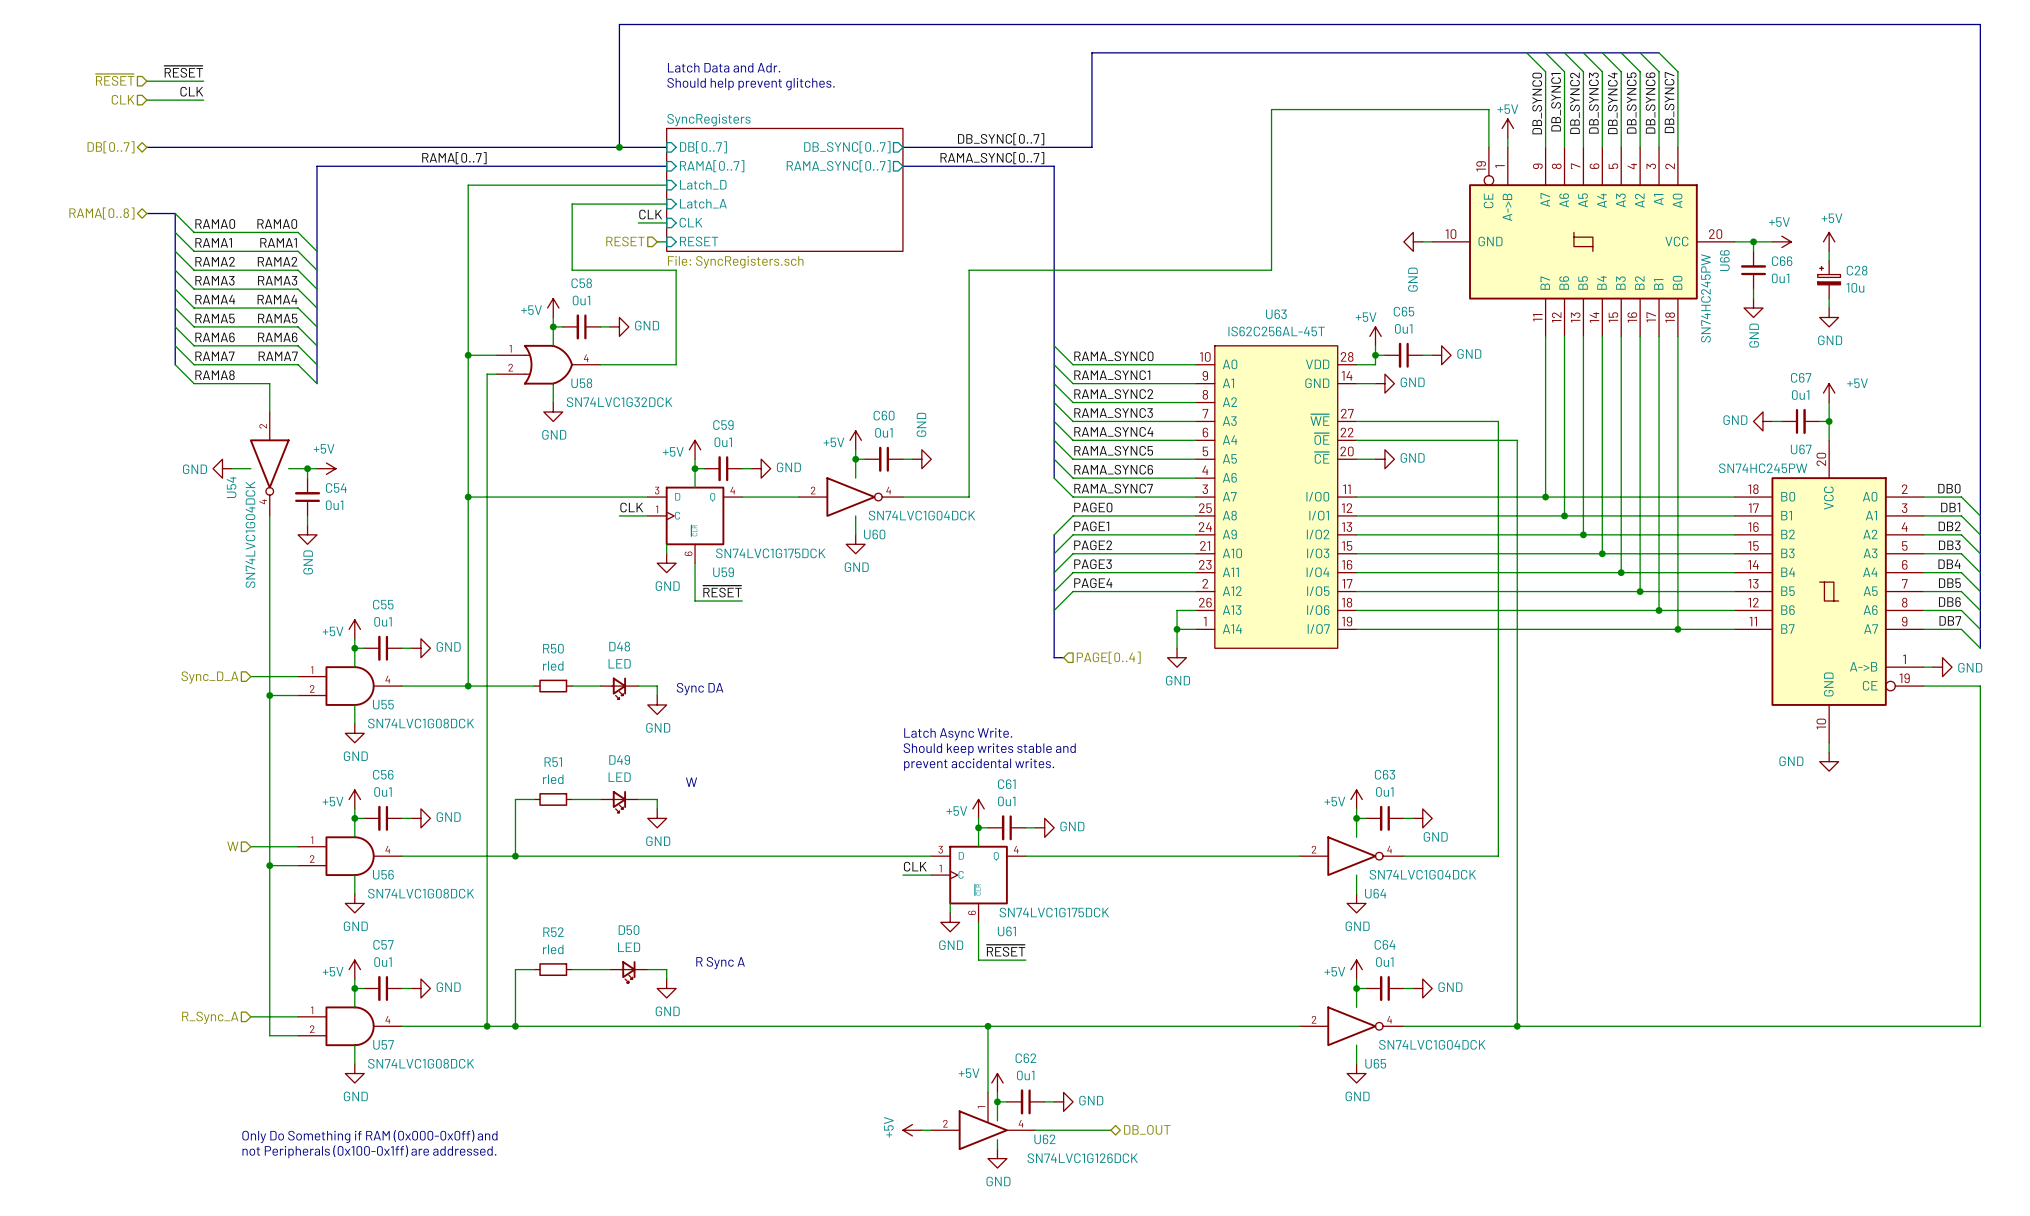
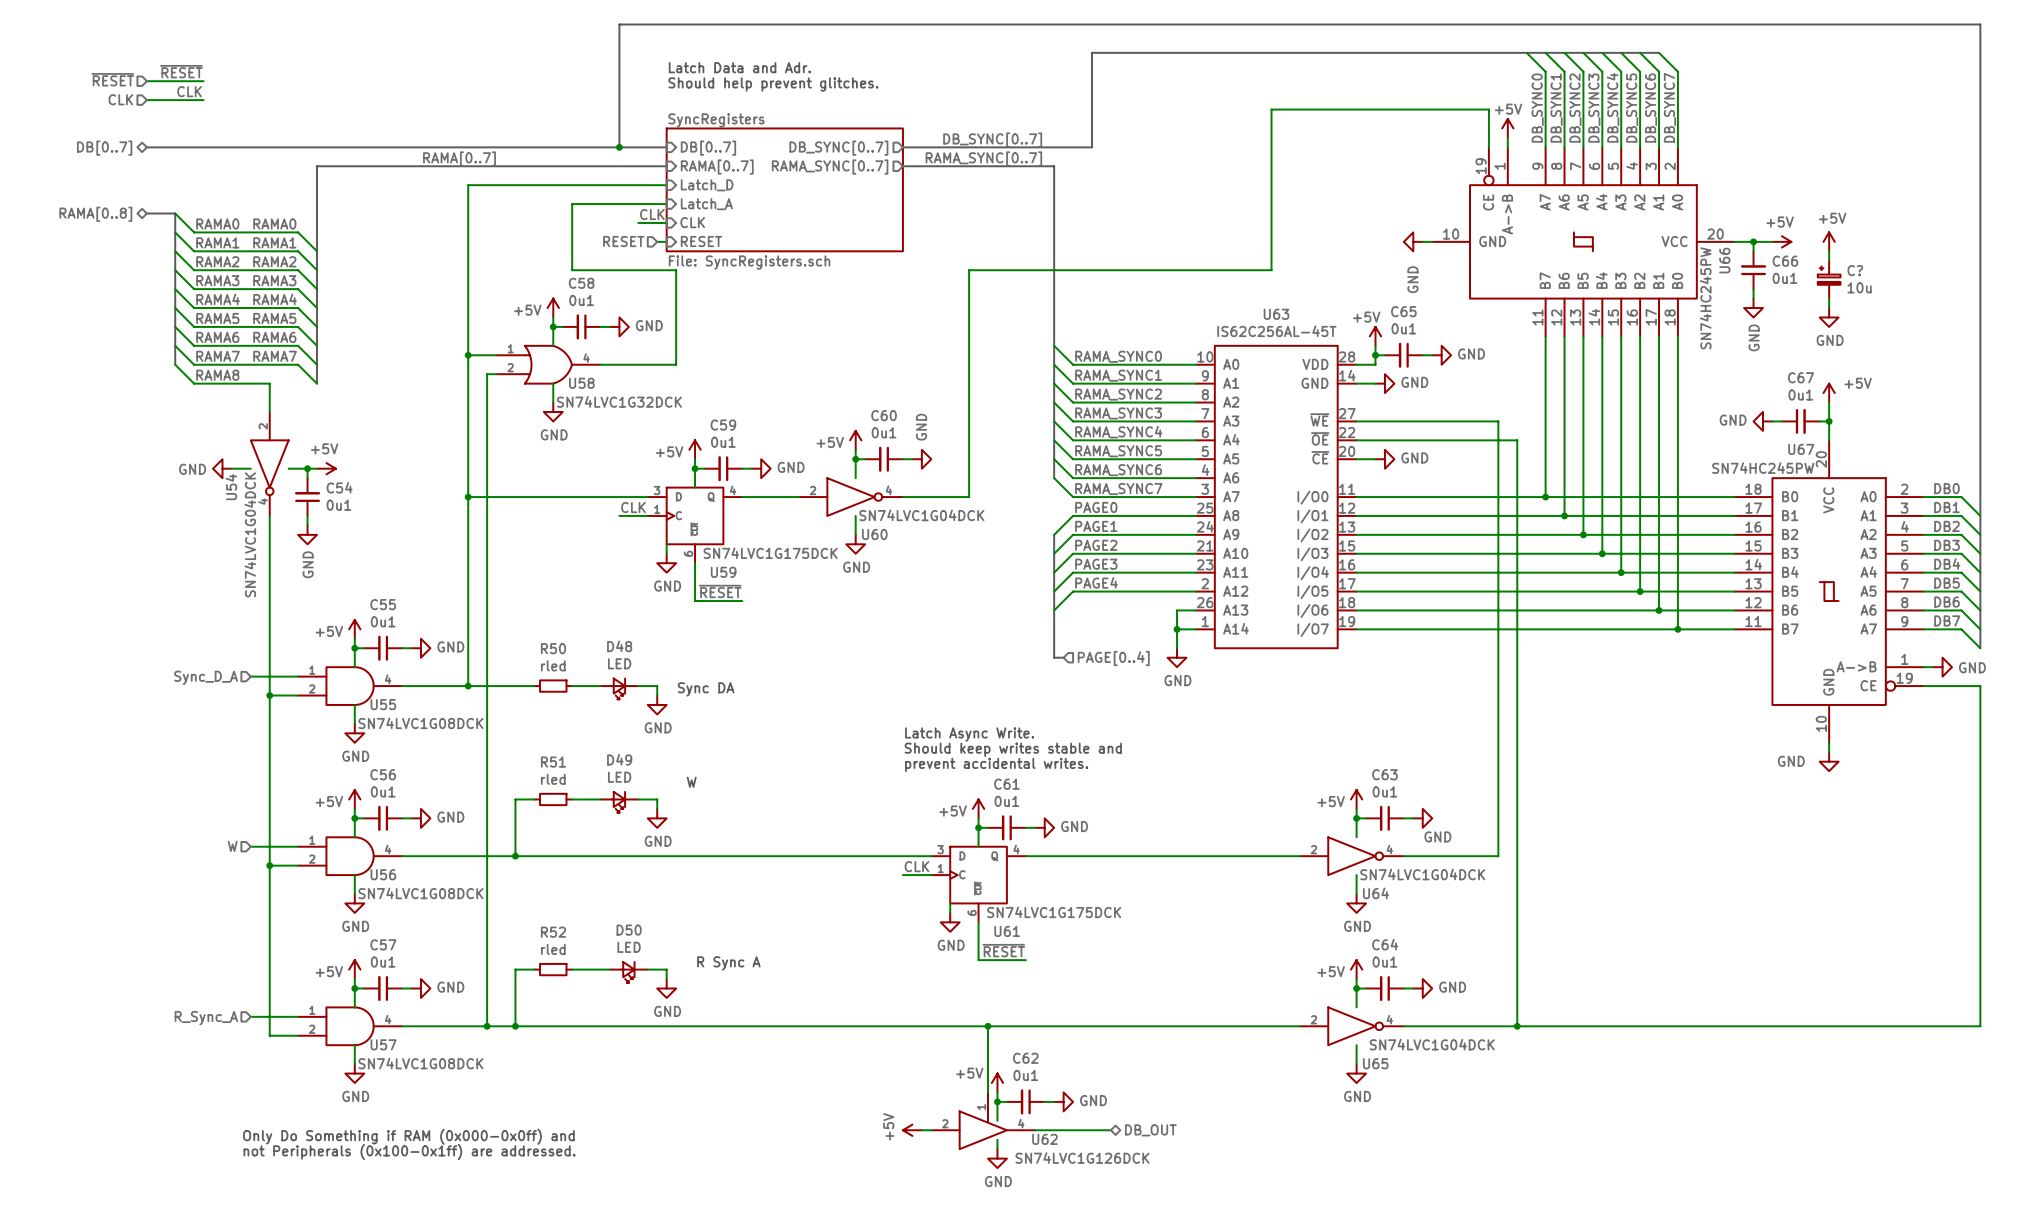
C28 name: C28 (1857, 270) -> C? (1855, 270)

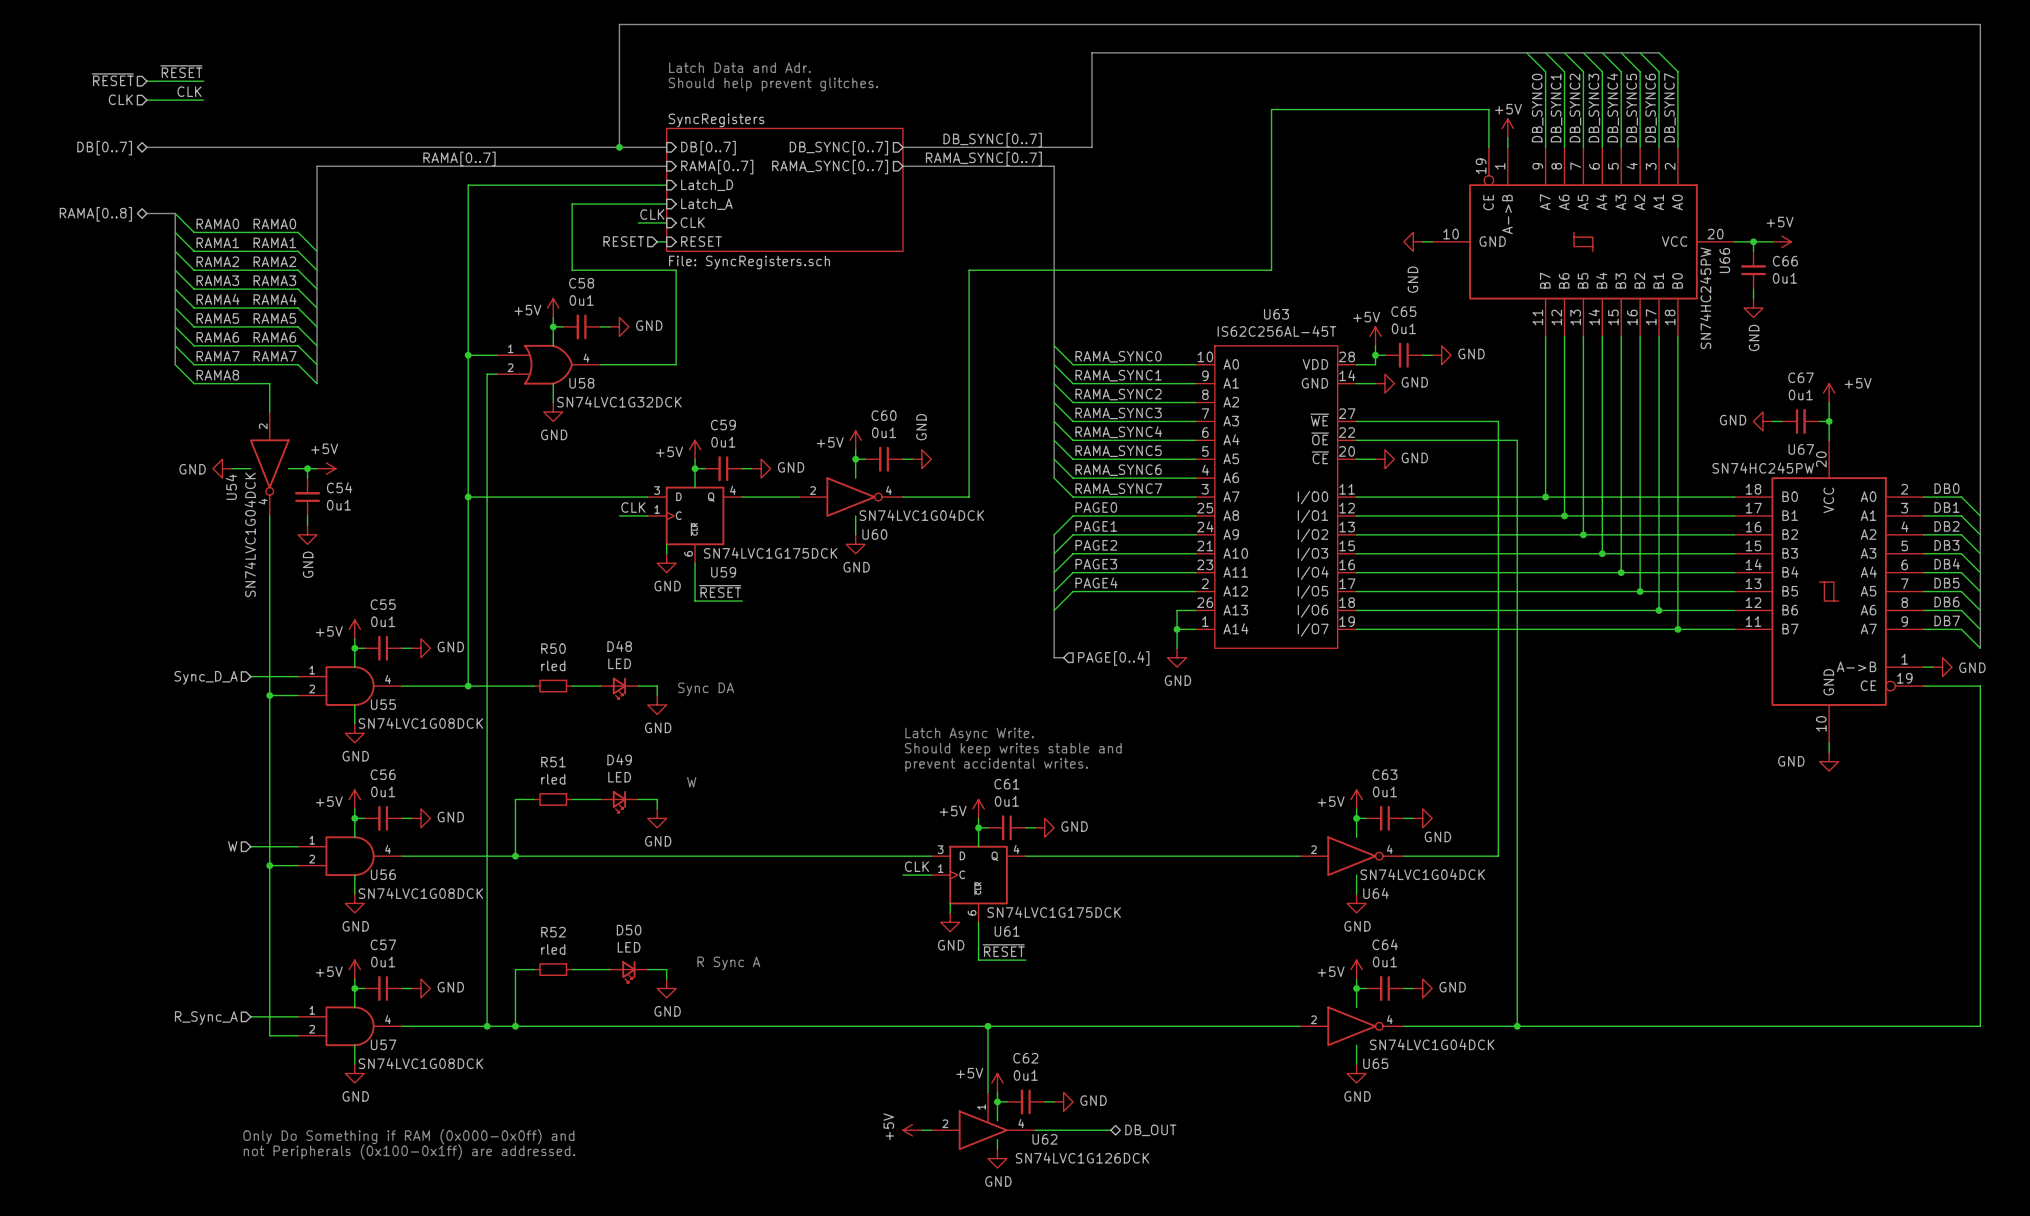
power symbol: +5V (1829, 241) -> none
wire: (1829, 251) (1829, 260) -> none
C?: 10u (1829, 279) -> none
wire: (1829, 298) (1829, 308) -> none
power symbol: GND (1829, 317) -> none

